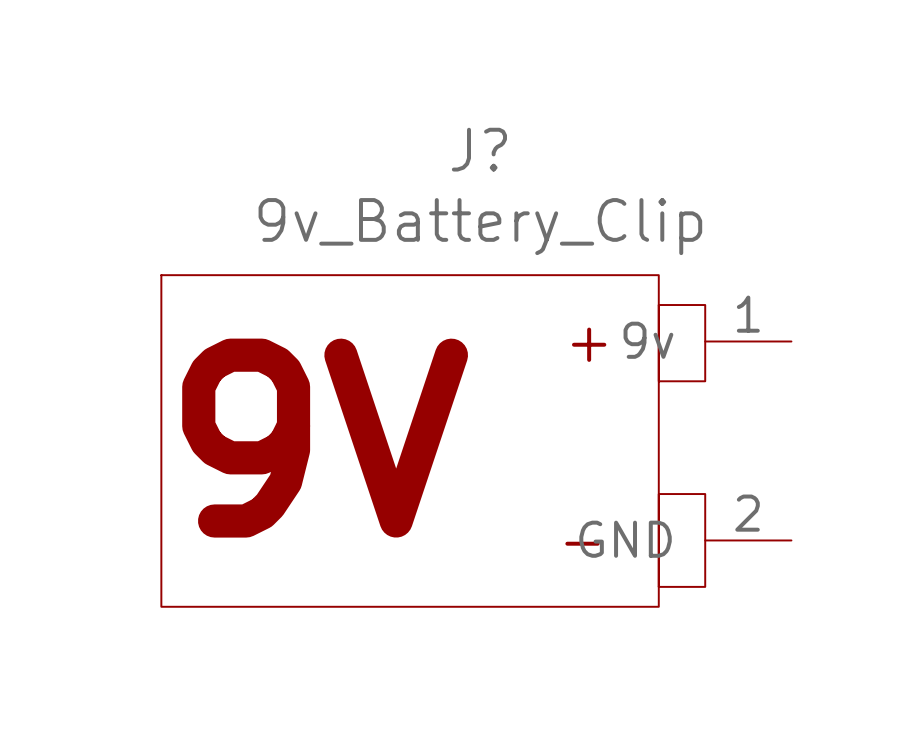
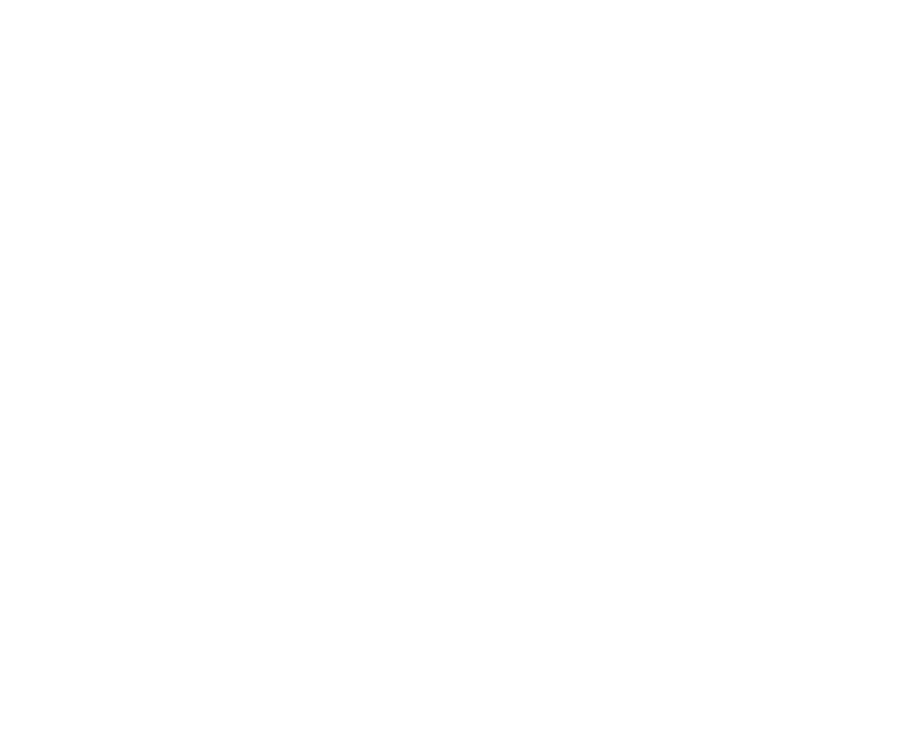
J?: 9v_Battery_Clip (476, 440) -> none

